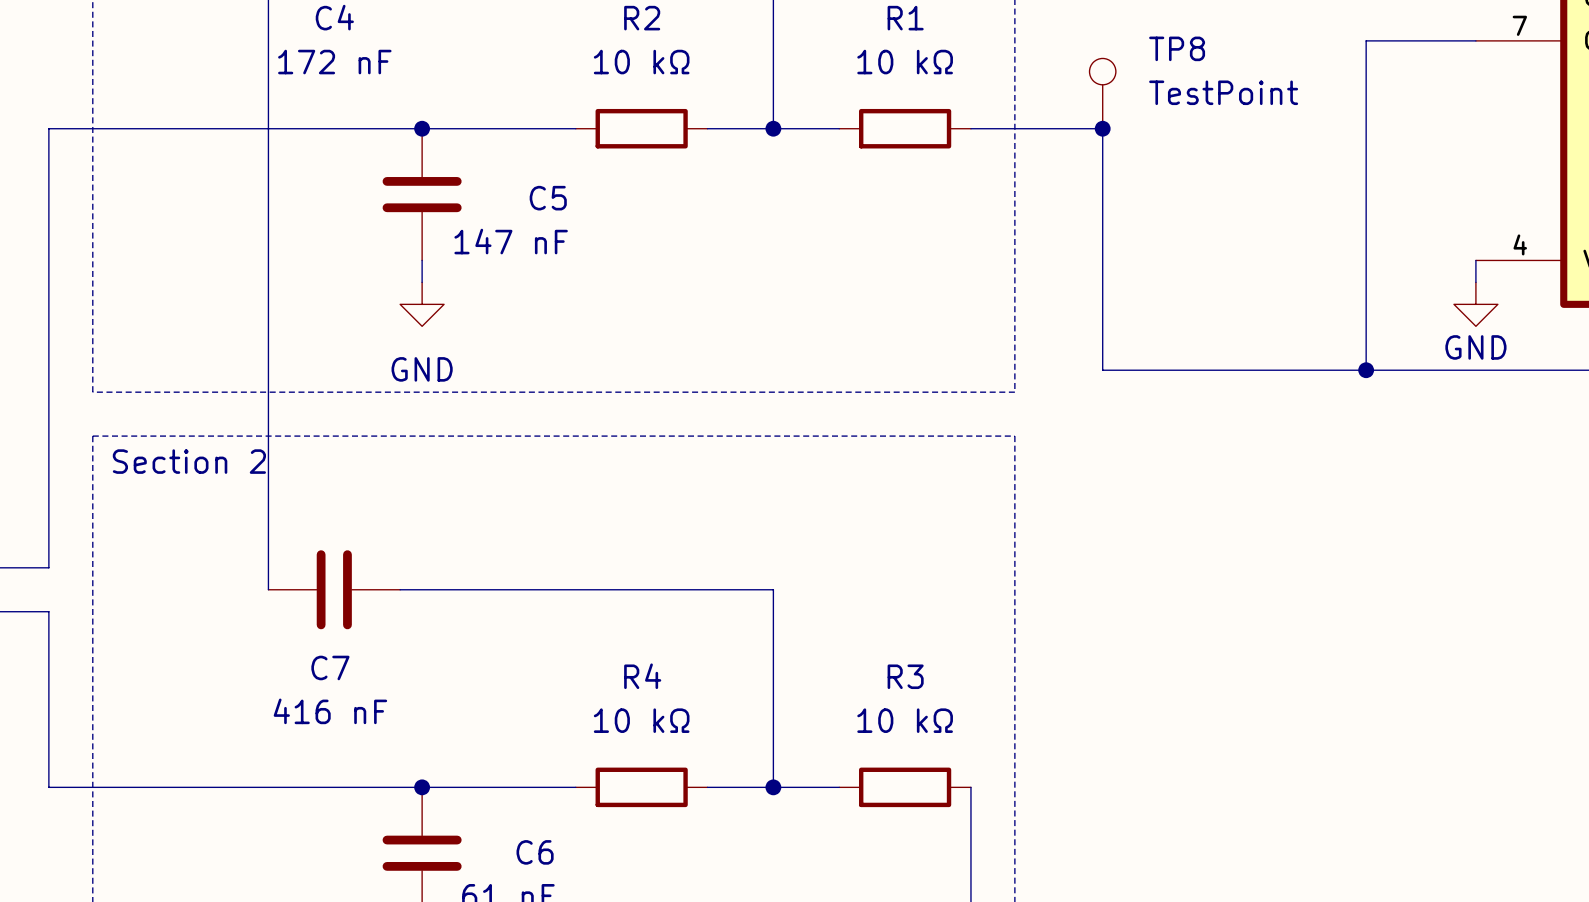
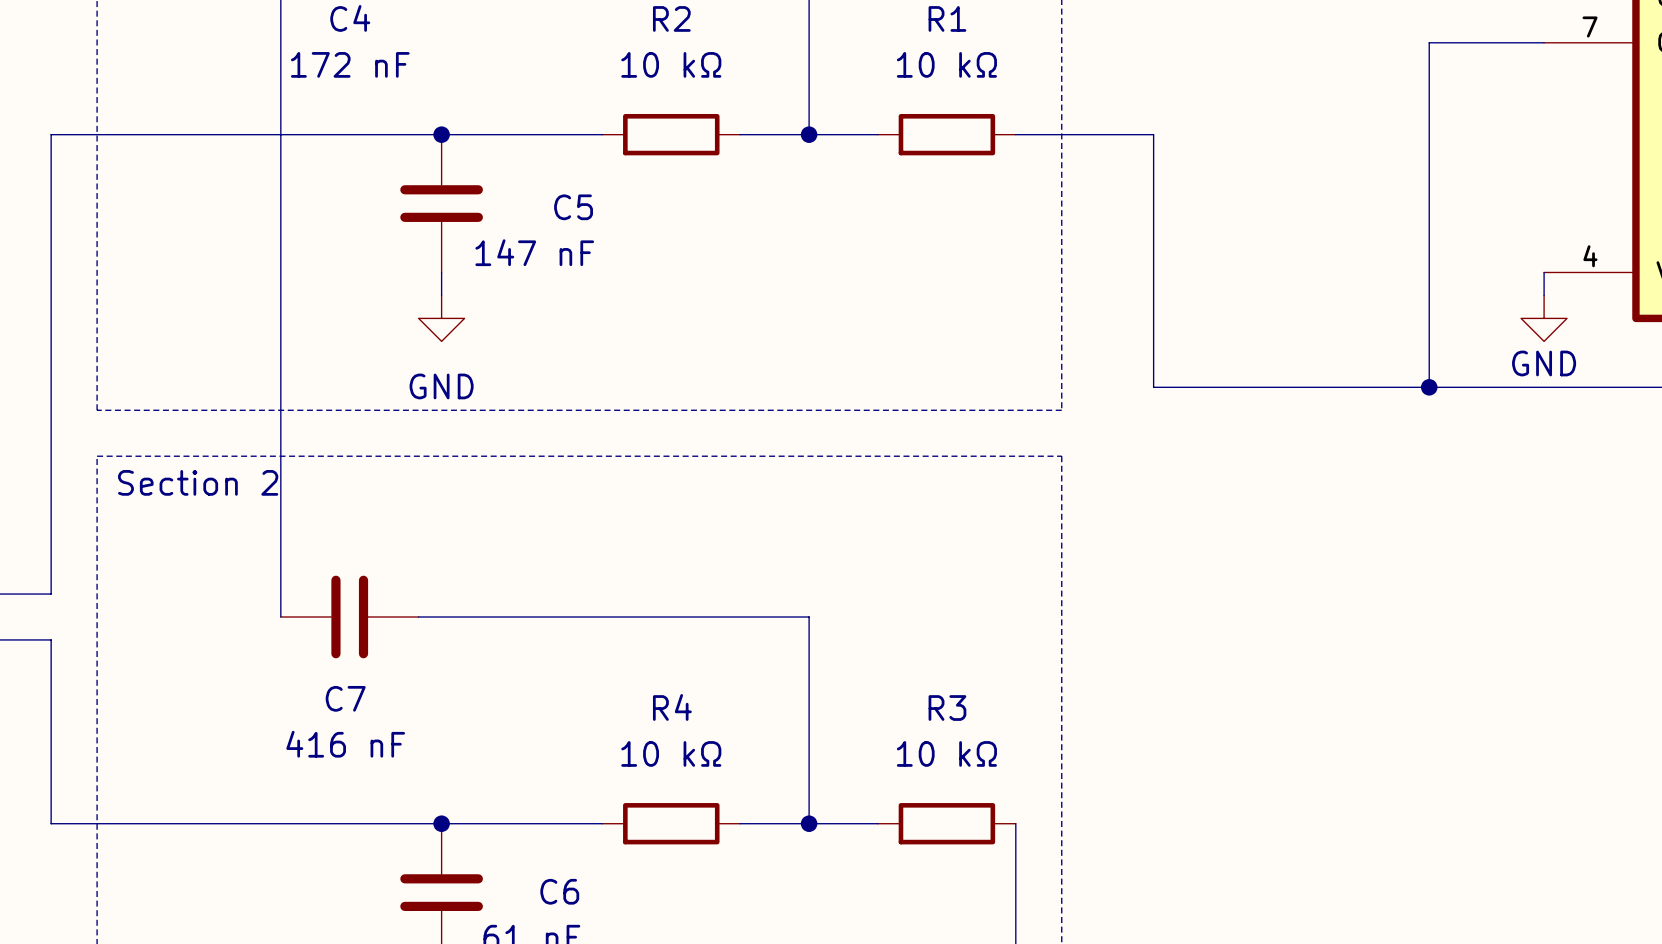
TP8: TestPoint (1102, 93) -> none
junction: (1102, 128) -> none

